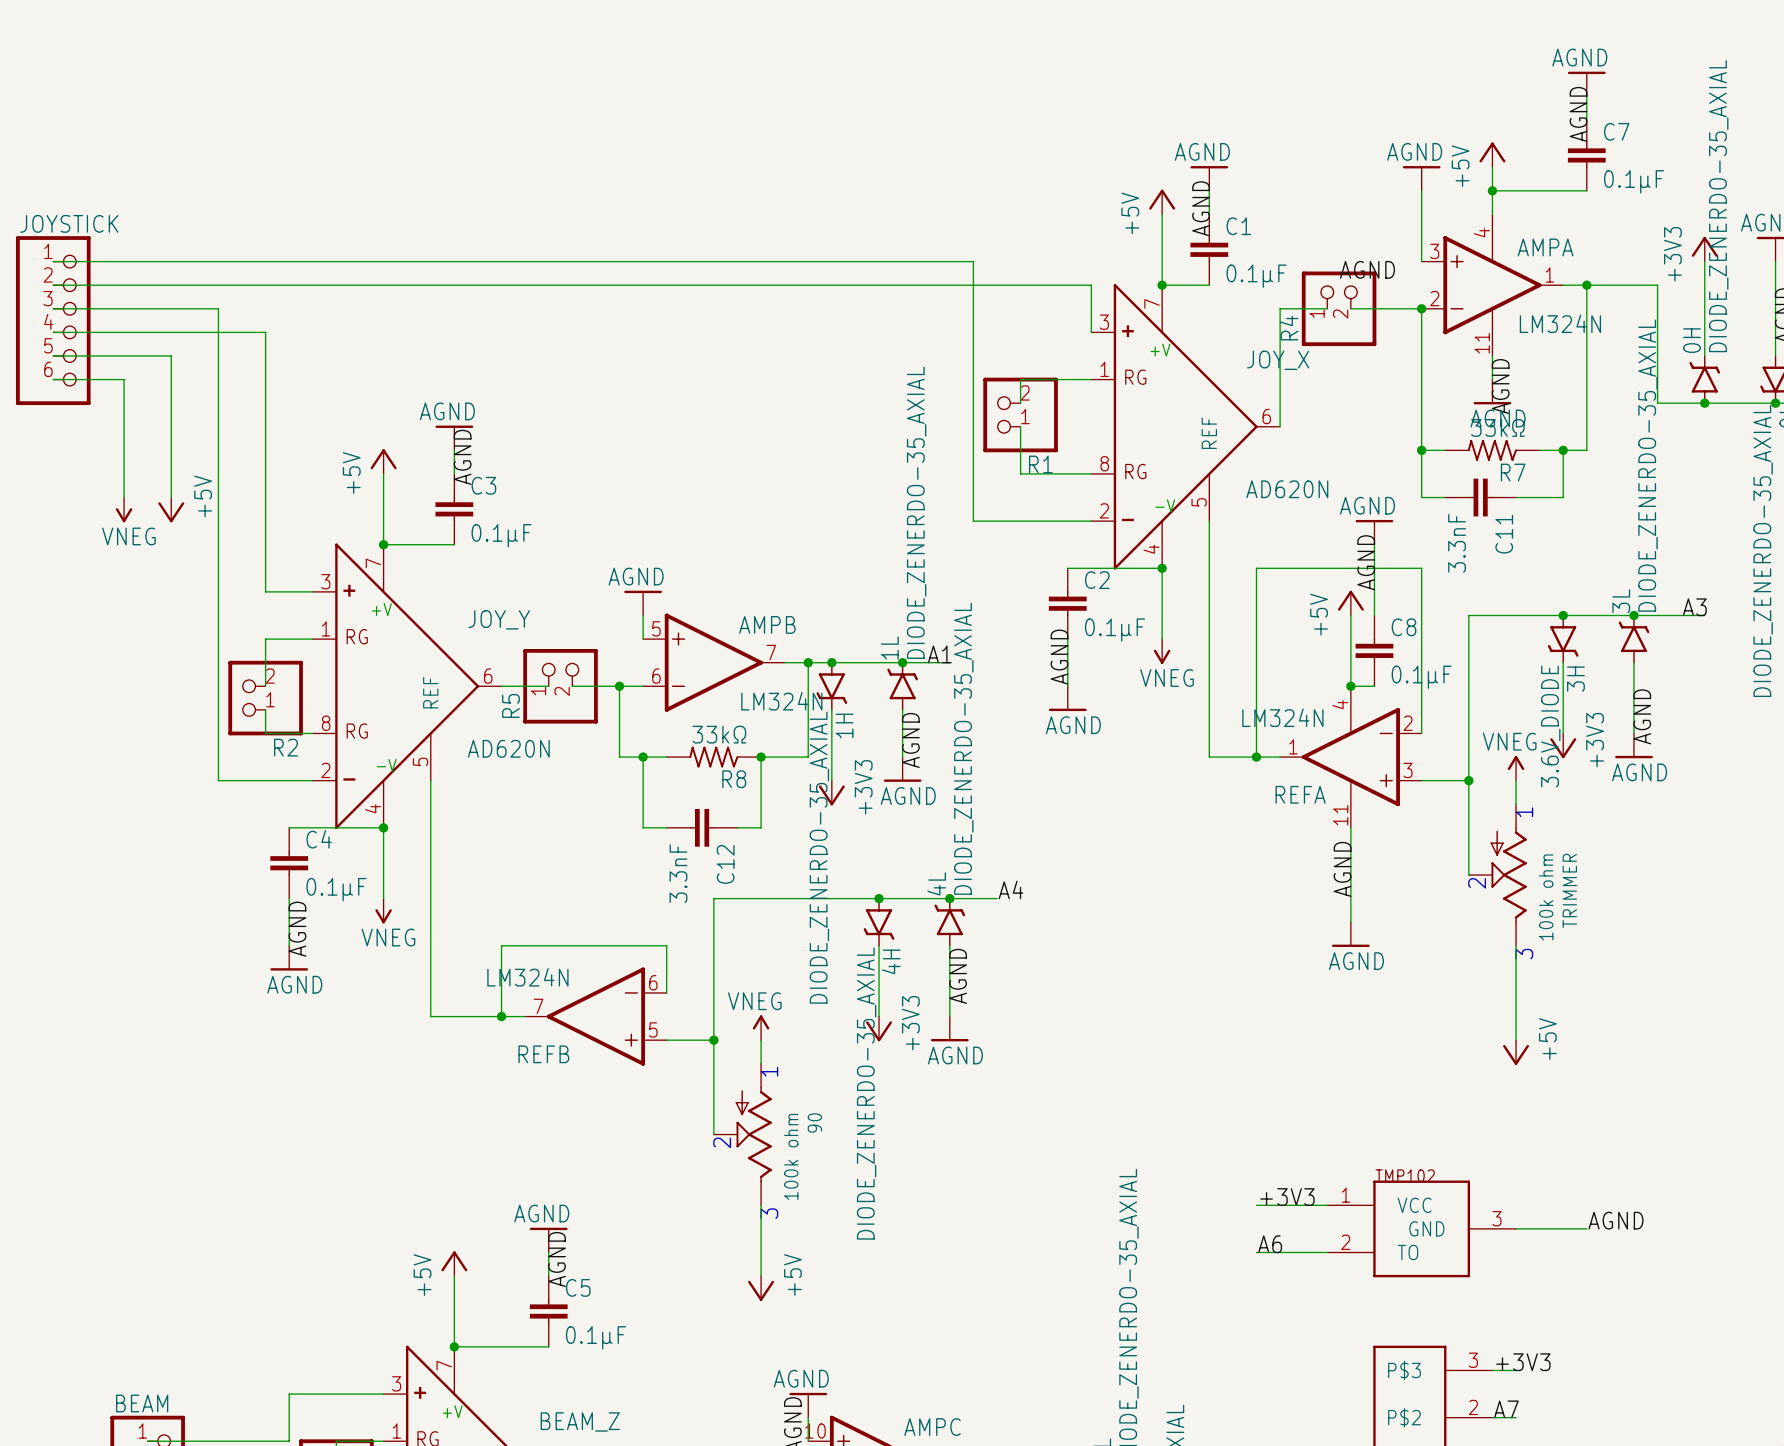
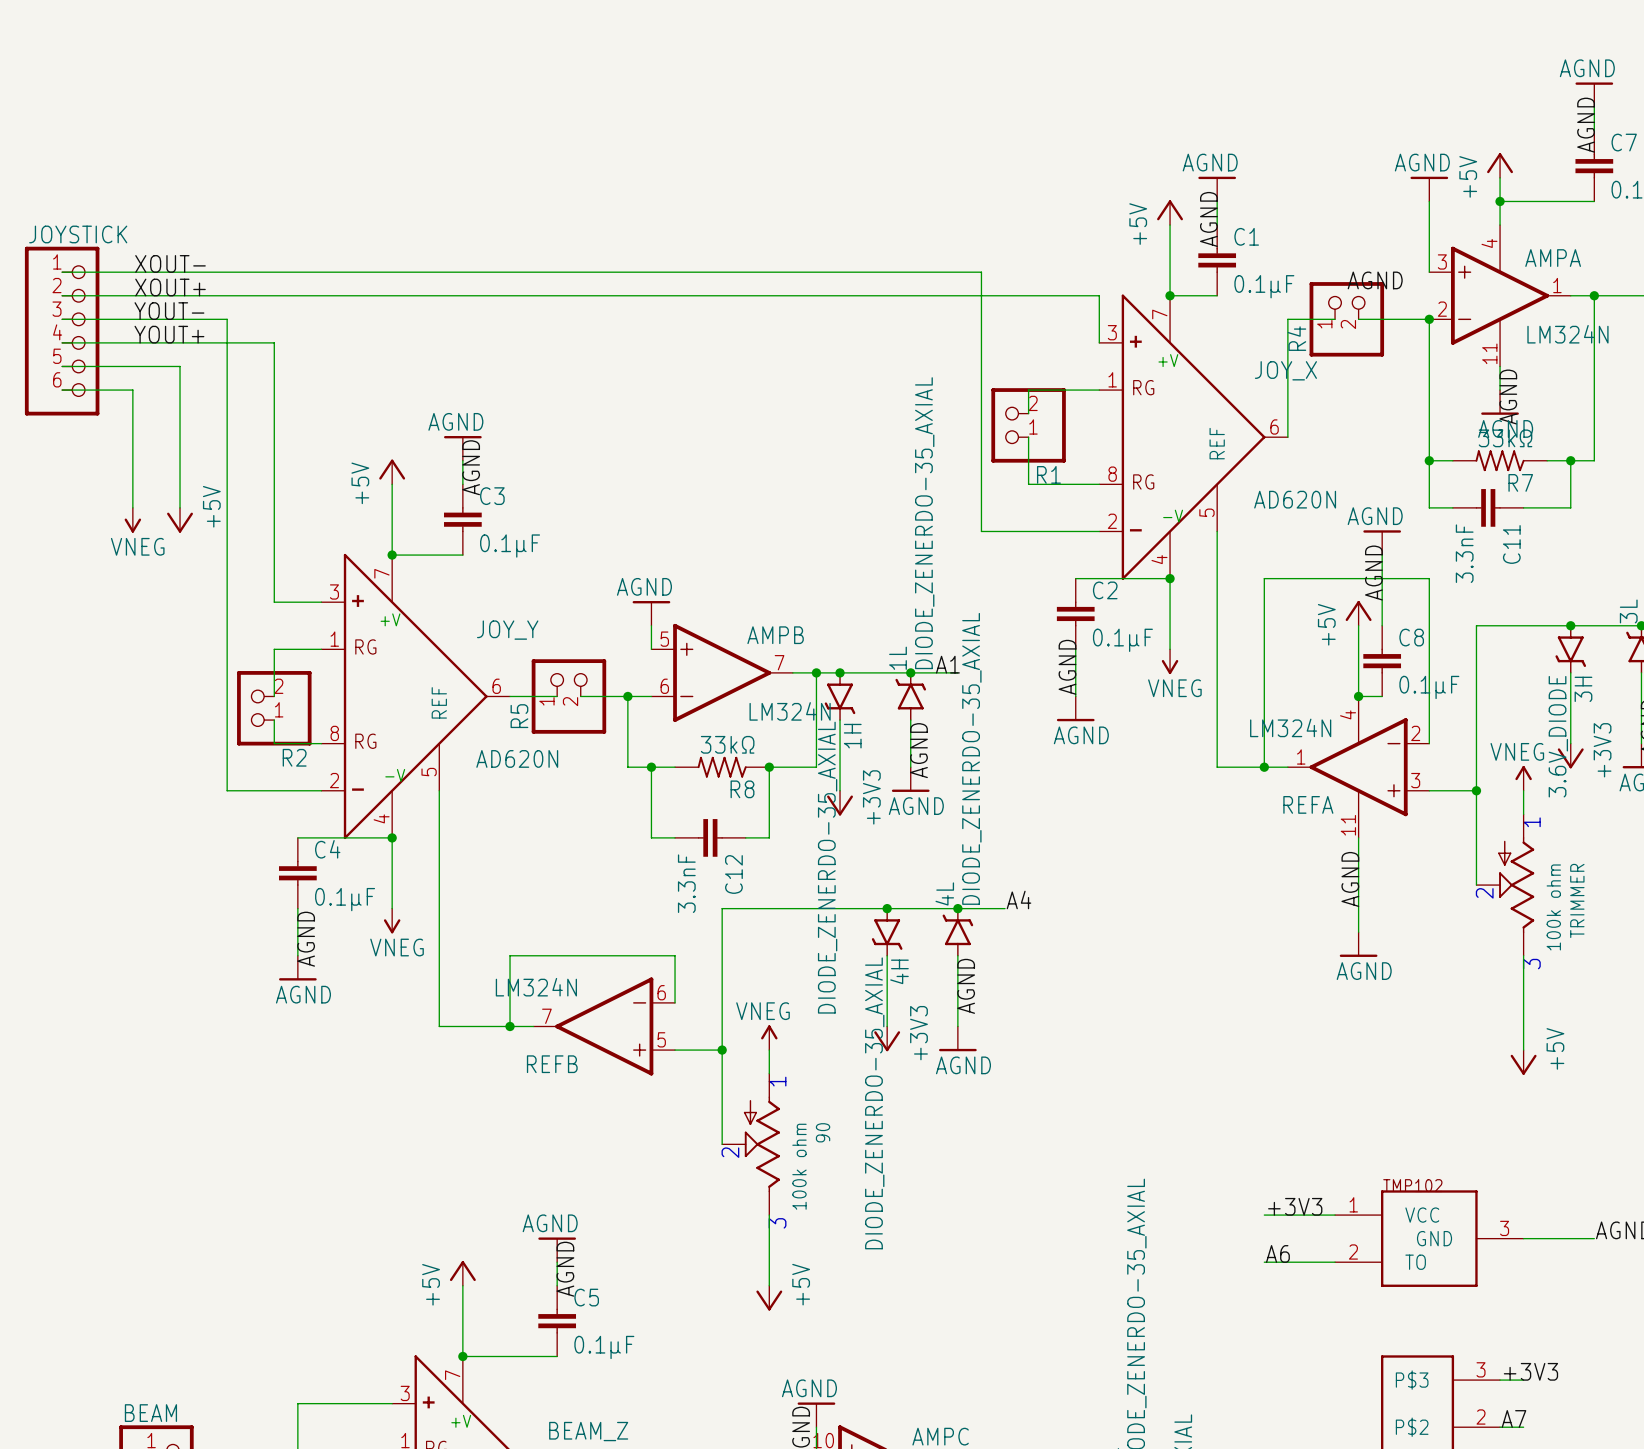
label: none -> XOUT- (170, 263)
label: none -> XOUT+ (170, 287)
label: none -> YOUT- (169, 311)
label: none -> YOUT+ (169, 334)

